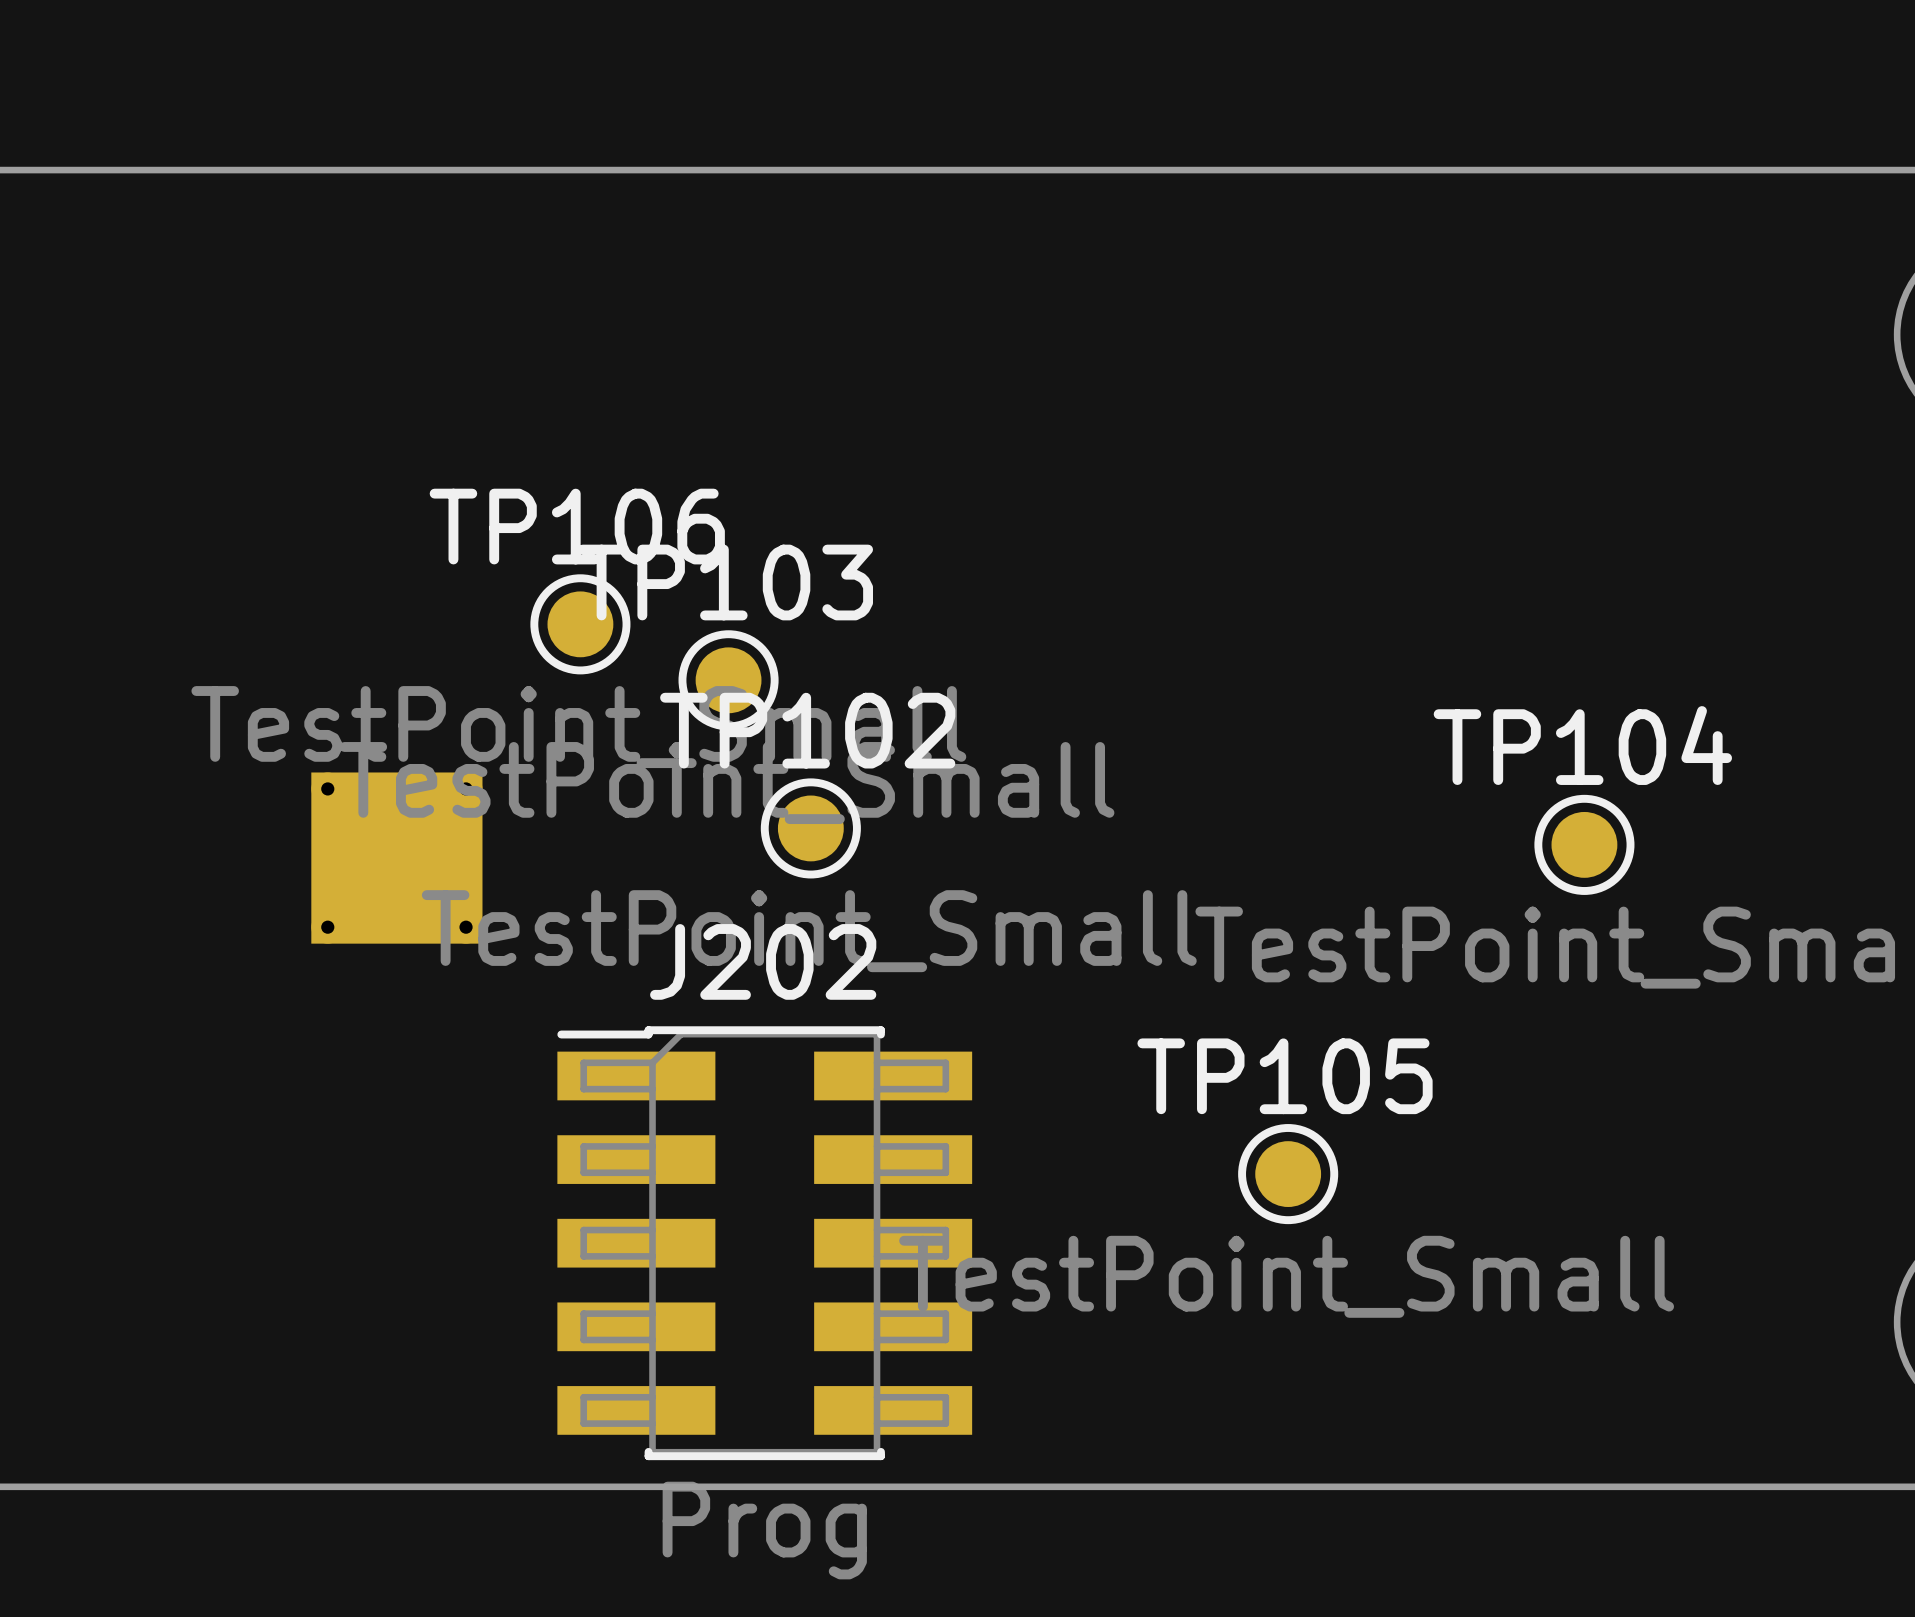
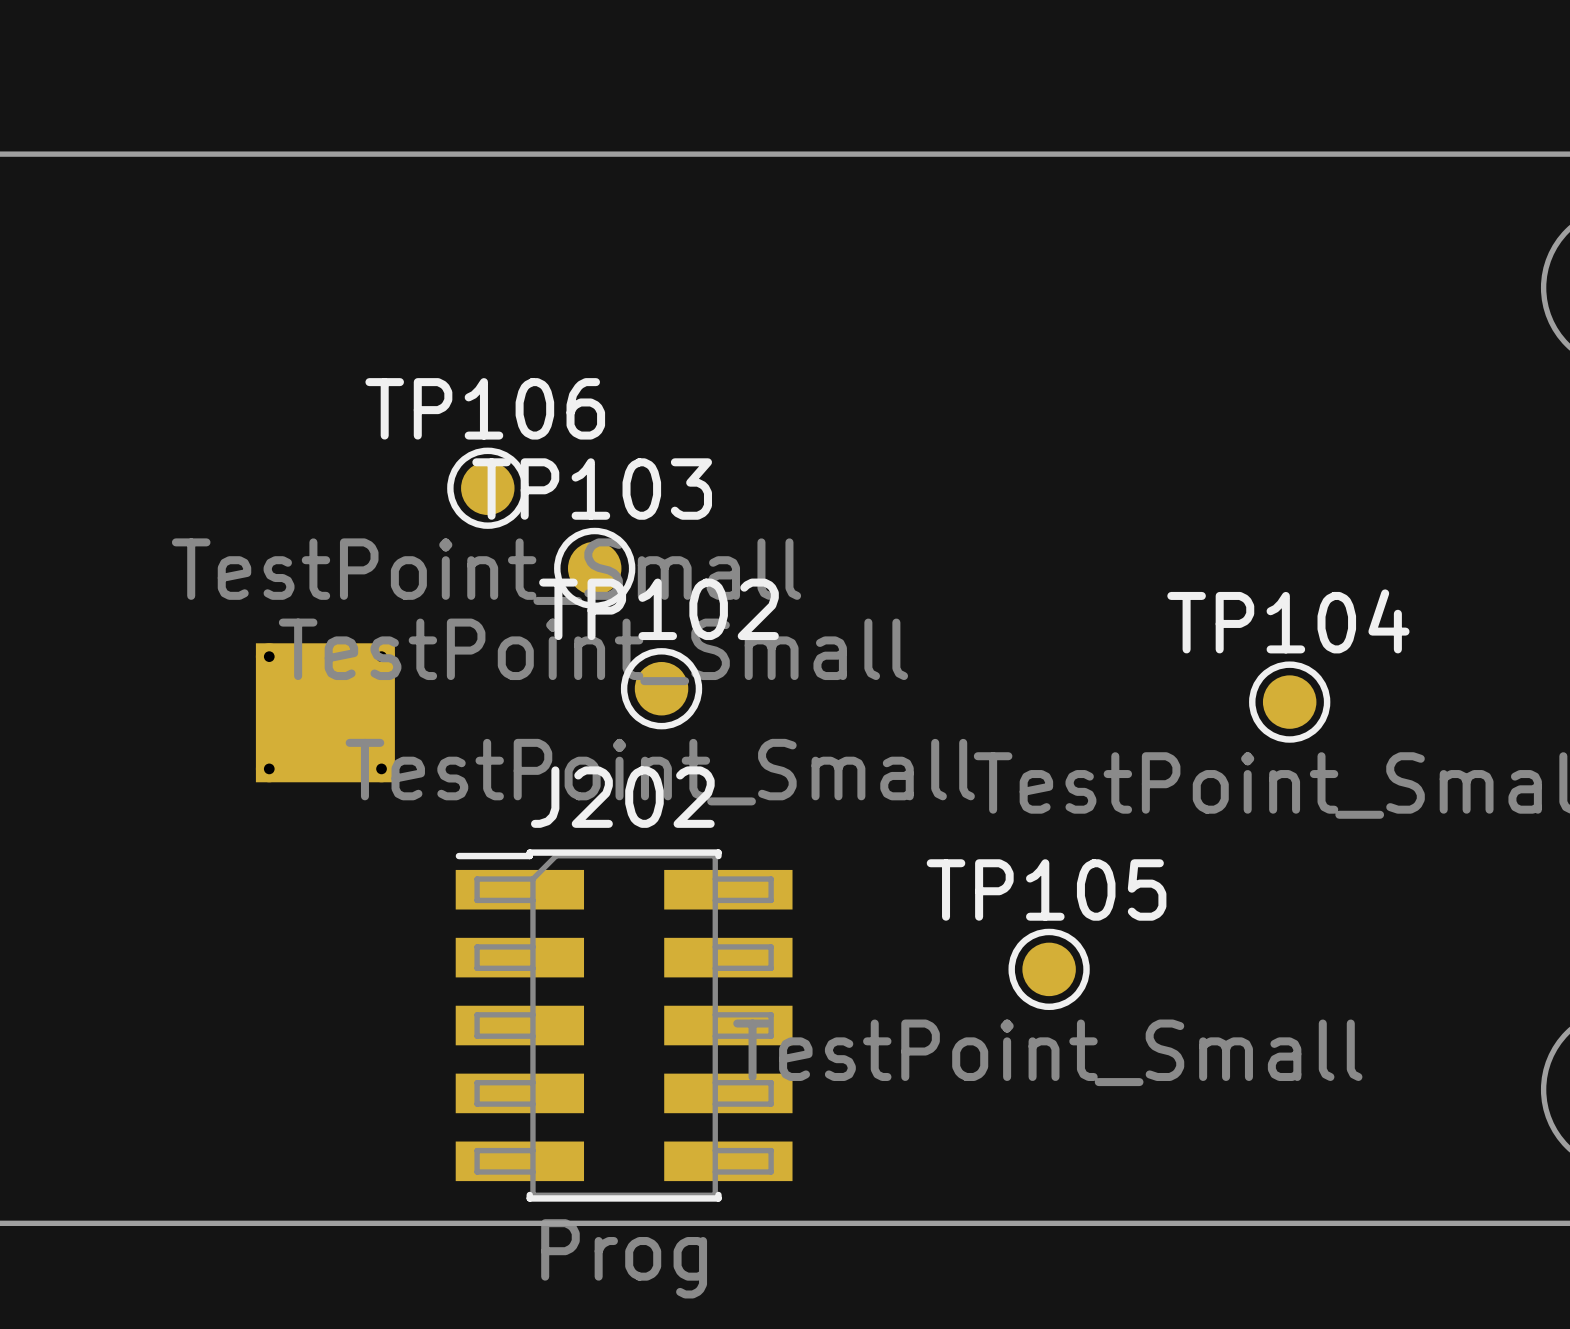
TP106 position: (580, 624) -> (487, 488)

